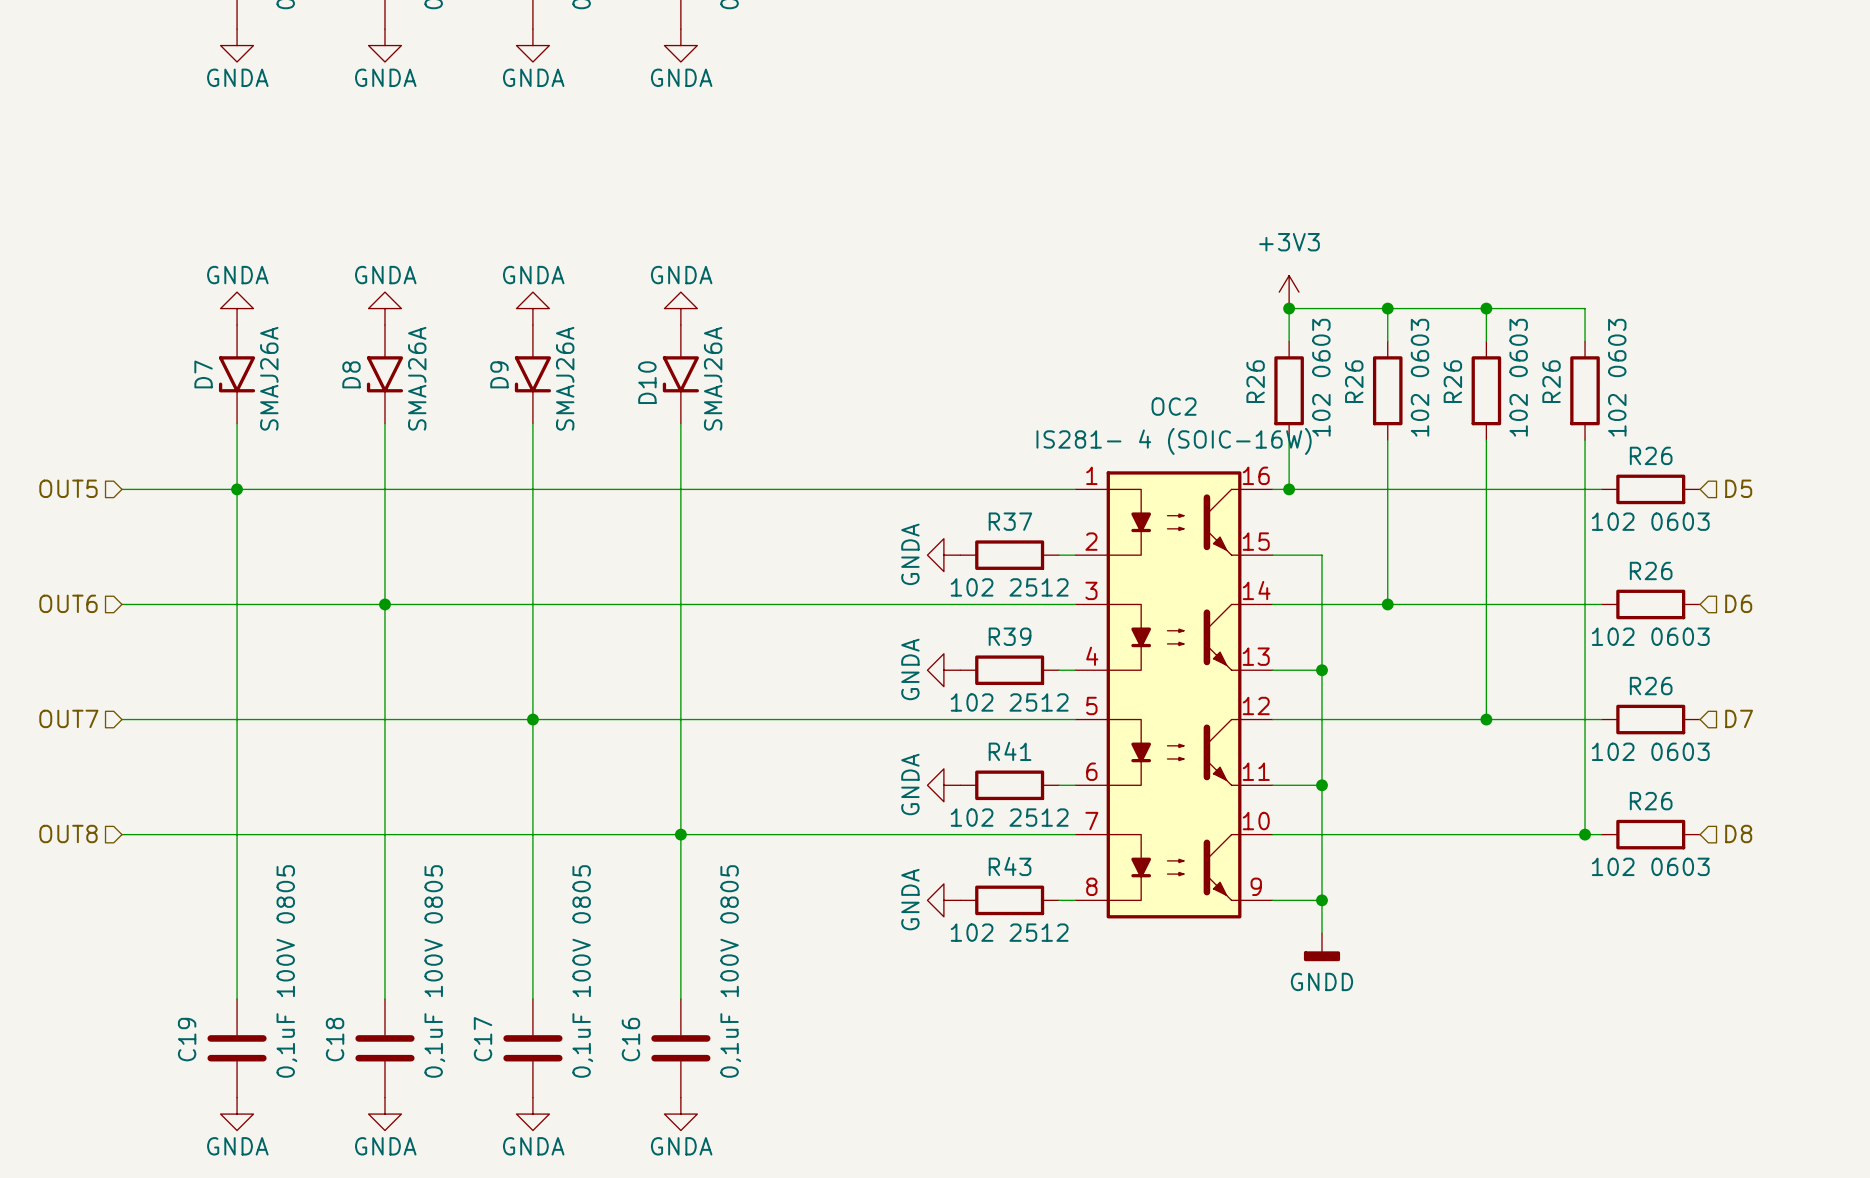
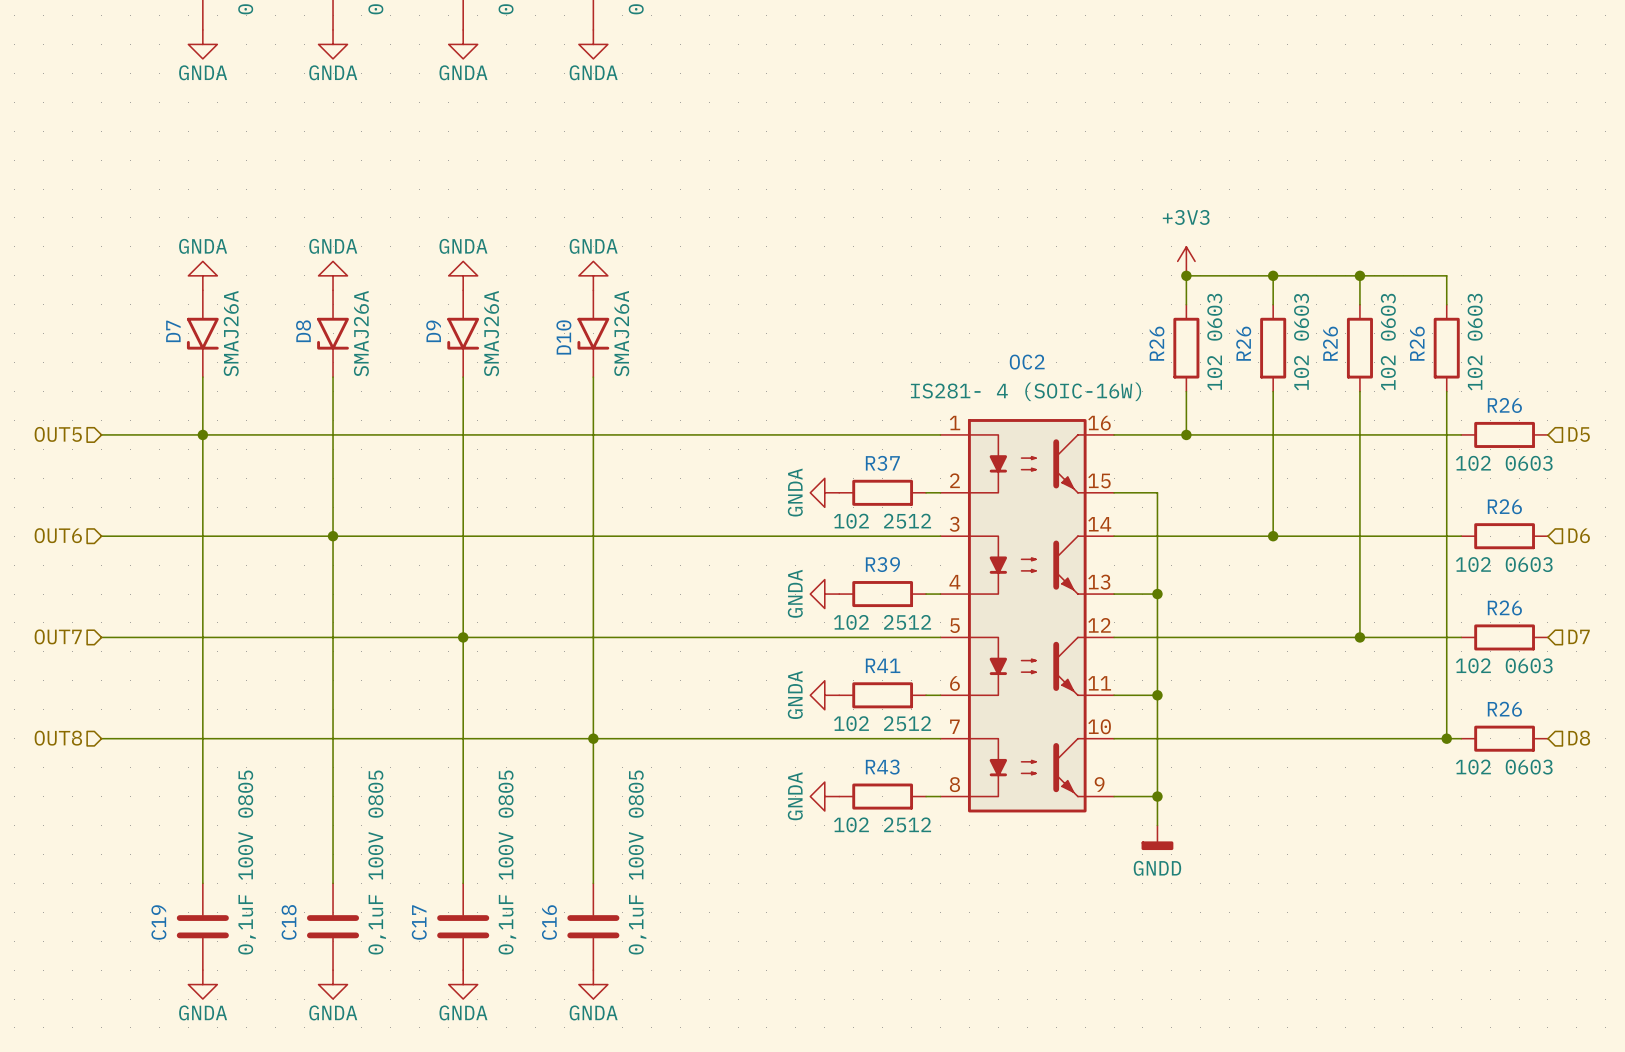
power symbol position: +3V3 (1289, 292) -> +3V3 (1186, 261)
junction: (1289, 308) -> none
wire: (1354, 308) (1289, 308) (1289, 341) -> (1186, 275) (1186, 304)
junction: none -> (1186, 275)
wire: (1387, 308) (1387, 341) -> (1273, 275) (1273, 304)
junction: (1387, 308) -> none
junction: none -> (1273, 275)
wire: (1486, 308) (1486, 341) -> (1359, 275) (1359, 304)
junction: (1486, 308) -> none
junction: none -> (1359, 275)
wire: (1585, 308) (1585, 341) -> (1388, 275) (1446, 275) (1446, 304)
R26: 102 0603 (1289, 390) -> none
R26: none -> 102 0603 (1186, 348)
R26: 102 0603 (1387, 390) -> none
R26: none -> 102 0603 (1273, 348)
R26: 102 0603 (1486, 390) -> none
R26: none -> 102 0603 (1359, 348)
R26: 102 0603 (1585, 390) -> none
R26: none -> 102 0603 (1446, 348)
wire: (1289, 440) (1289, 489) -> (1186, 391) (1186, 434)
wire: (1387, 440) (1387, 604) -> (1273, 391) (1273, 536)
wire: (1486, 440) (1486, 719) -> (1359, 391) (1359, 637)
wire: (1585, 440) (1585, 834) -> (1446, 391) (1446, 738)
hierarchical label position: D5 (1738, 488) -> D5 (1579, 434)
junction: (1289, 489) -> none
junction: none -> (1186, 434)
wire: none -> (1403, 434) (1461, 434)
R26: 102 0603 (1650, 489) -> none
R26: none -> 102 0603 (1504, 434)
hierarchical label position: D6 (1738, 603) -> D6 (1579, 535)
junction: (1387, 604) -> none
junction: none -> (1273, 536)
wire: none -> (1403, 536) (1461, 536)
R26 position: (1650, 604) -> (1504, 536)
hierarchical label position: D7 (1739, 718) -> D7 (1579, 636)
junction: (1486, 719) -> none
junction: none -> (1359, 637)
wire: none -> (1403, 637) (1461, 637)
R26 position: (1650, 719) -> (1504, 637)
hierarchical label position: D8 (1738, 833) -> D8 (1579, 738)
junction: (1585, 834) -> none
wire: none -> (1403, 738) (1461, 738)
junction: none -> (1446, 738)
R26 position: (1650, 834) -> (1504, 738)

